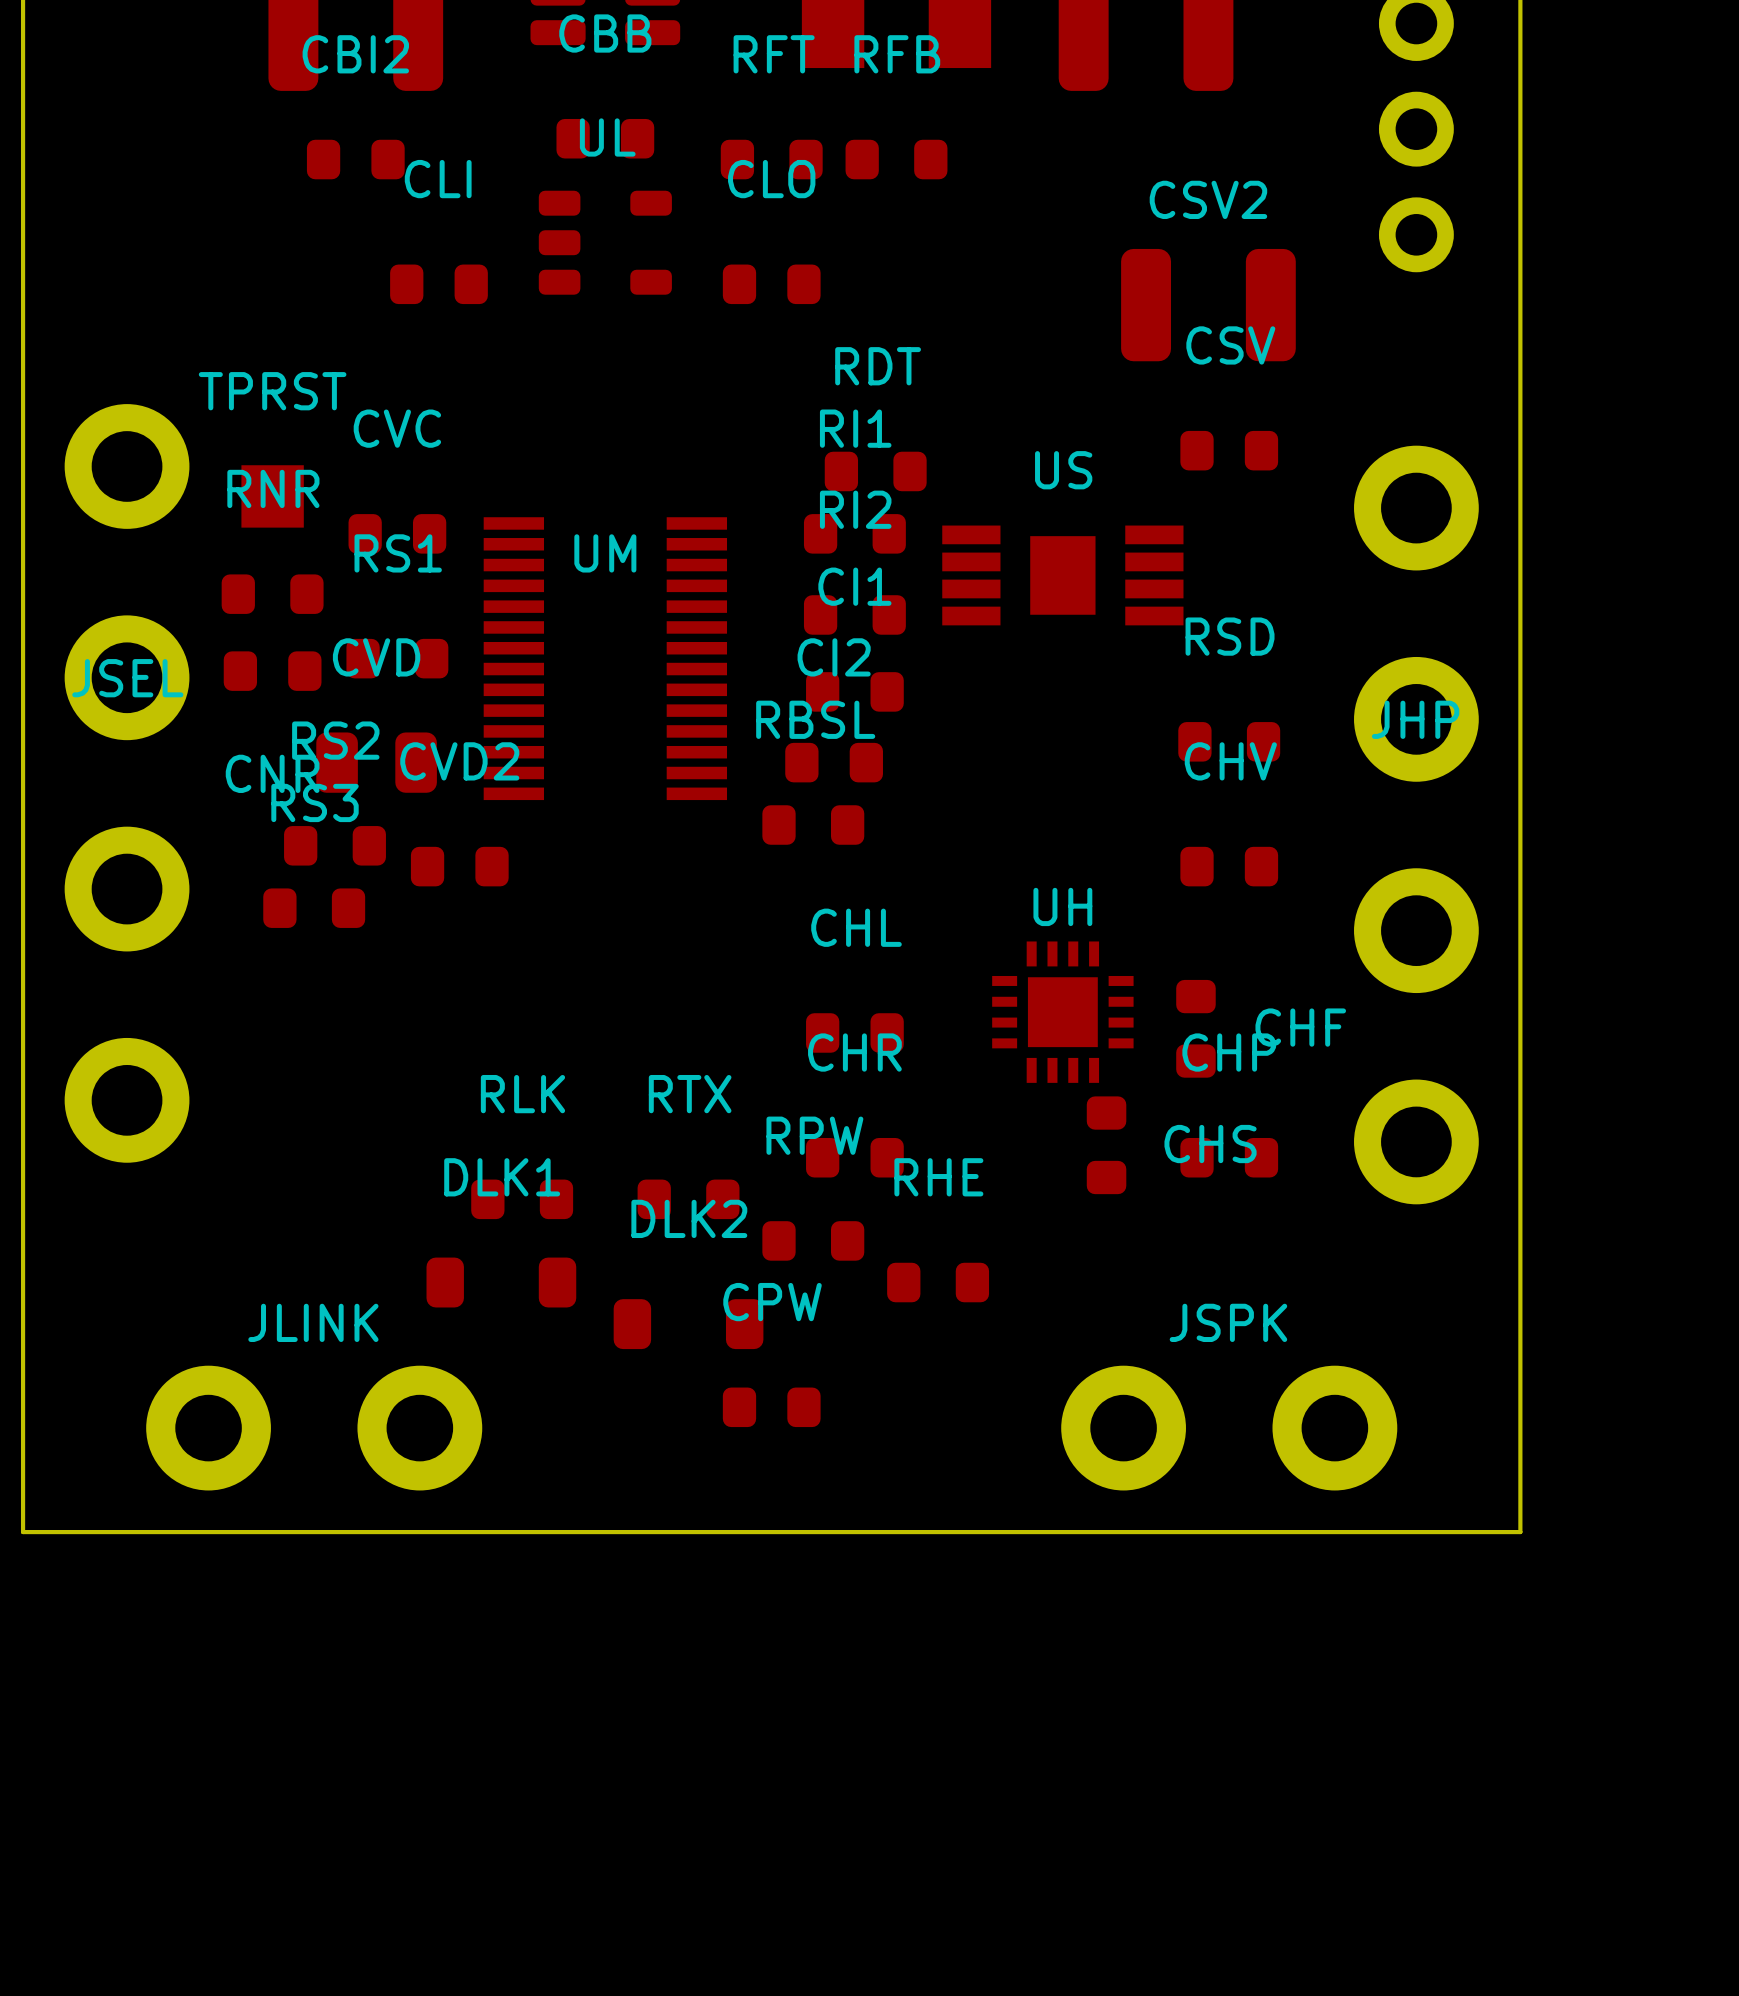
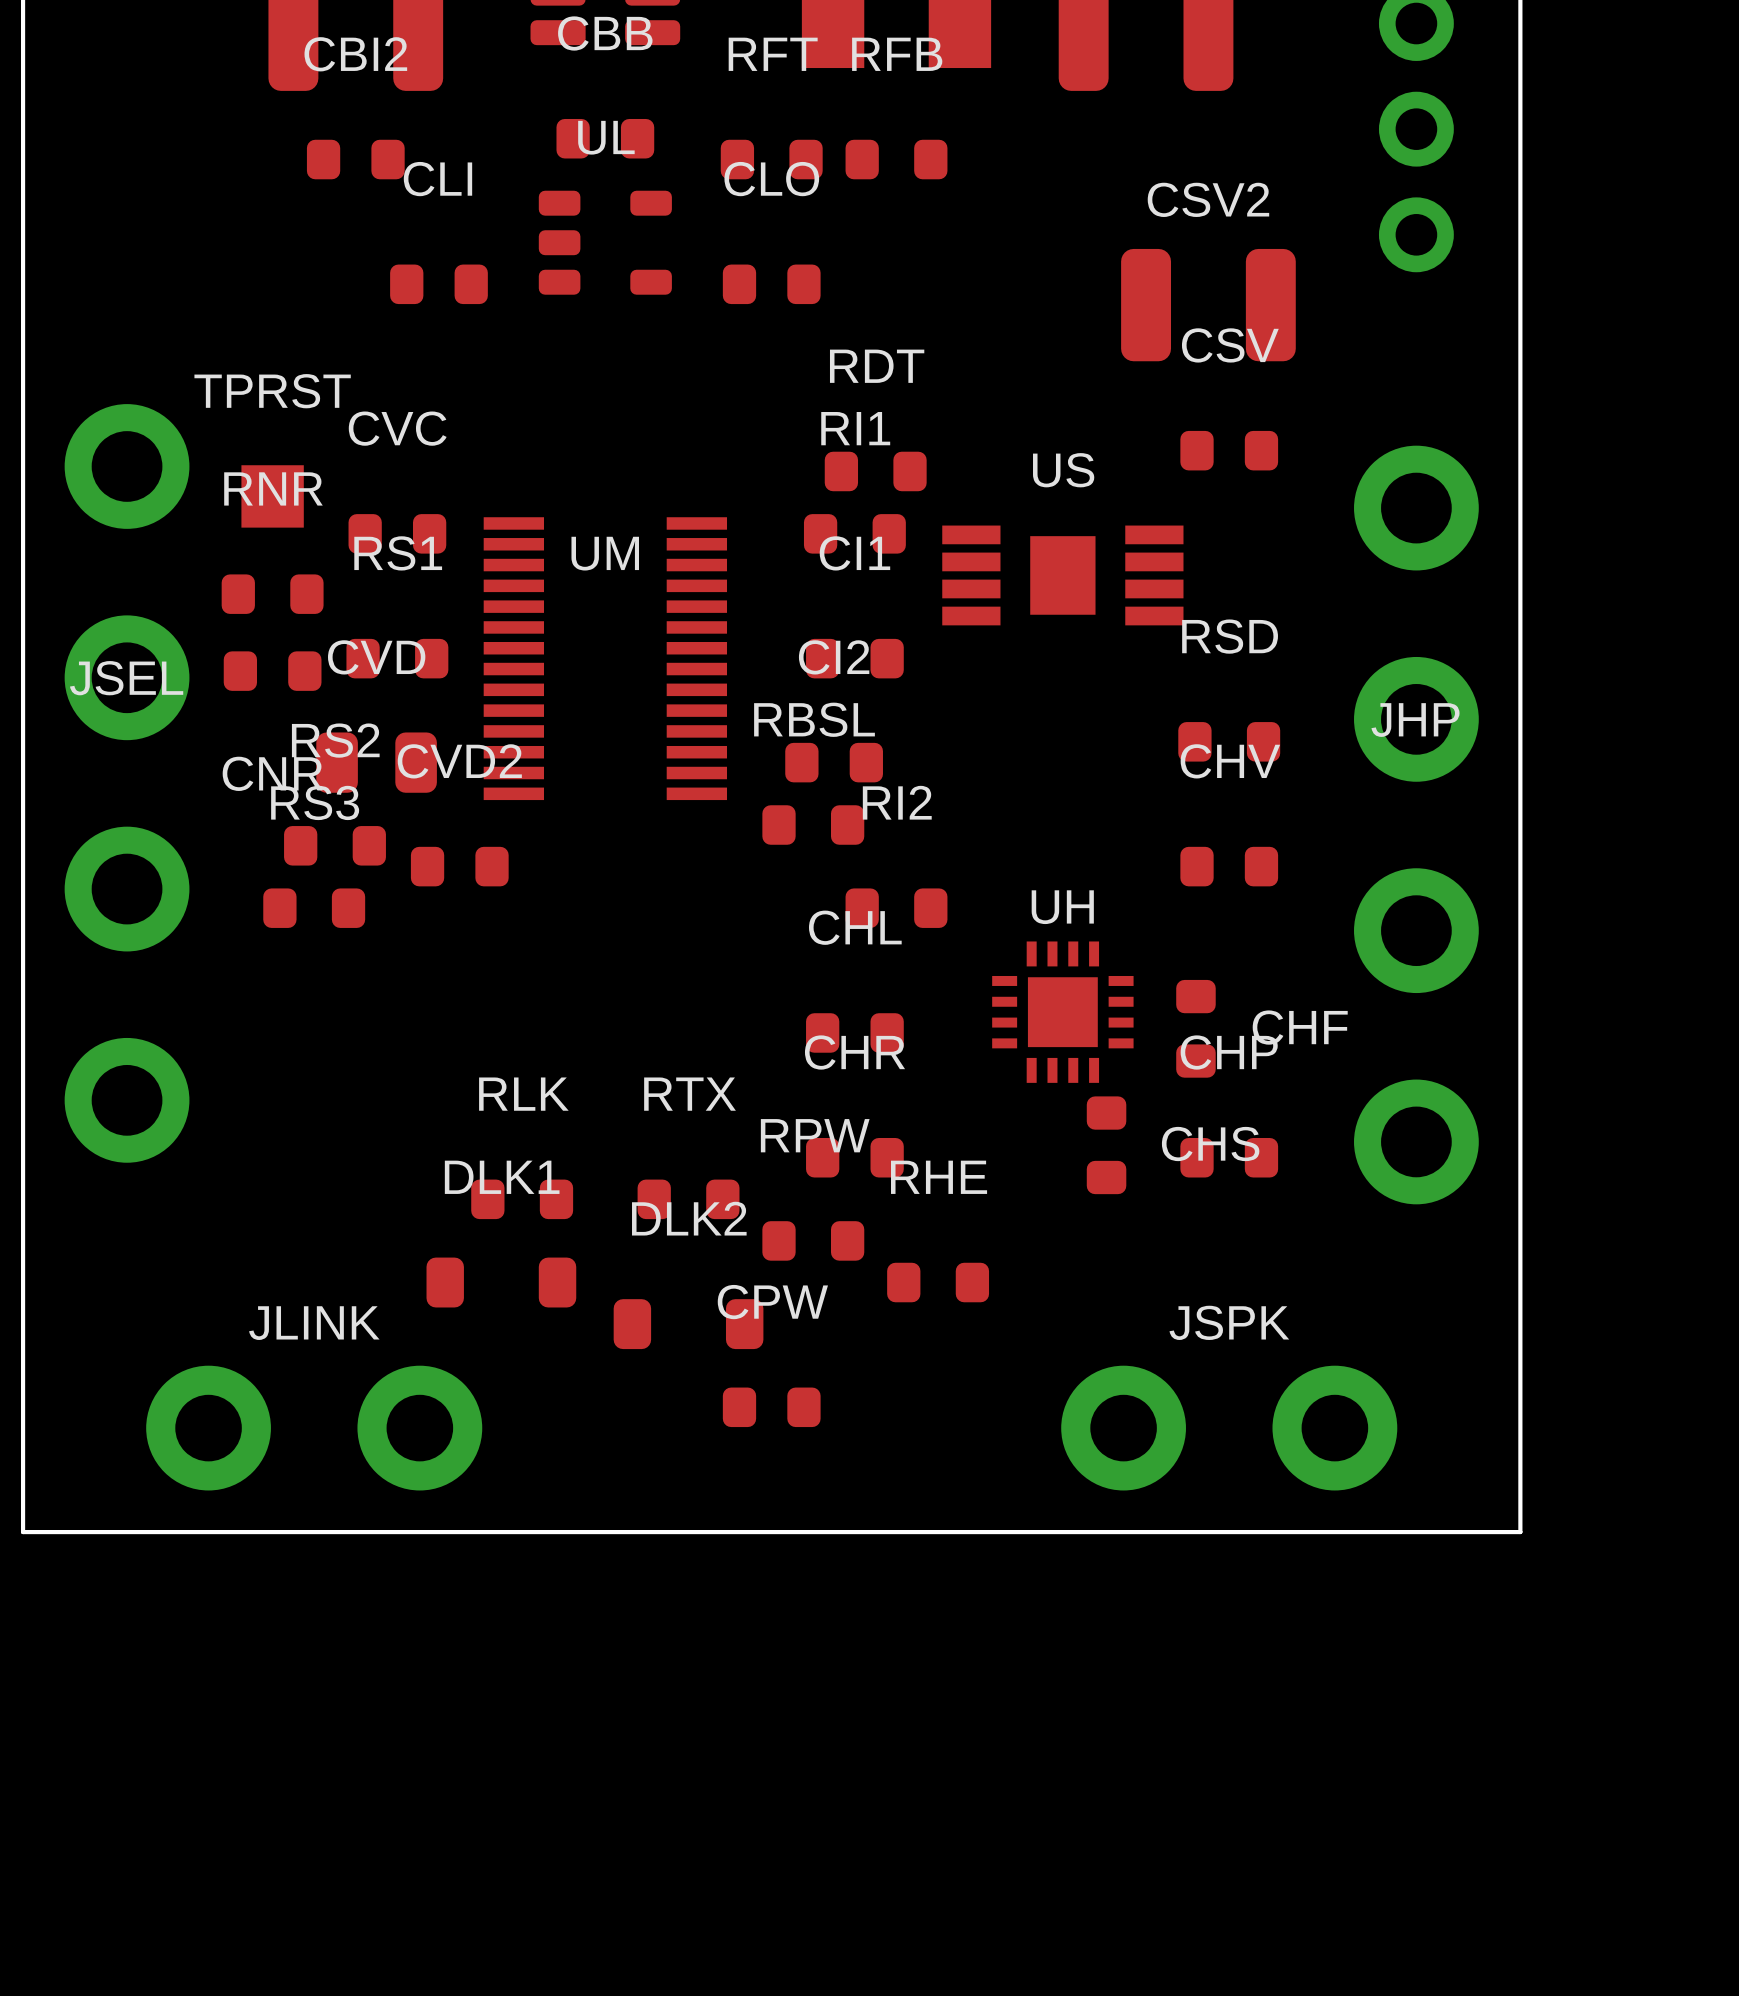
RI2 position: (854, 614) -> (896, 908)
CI1 position: (854, 691) -> (854, 658)

